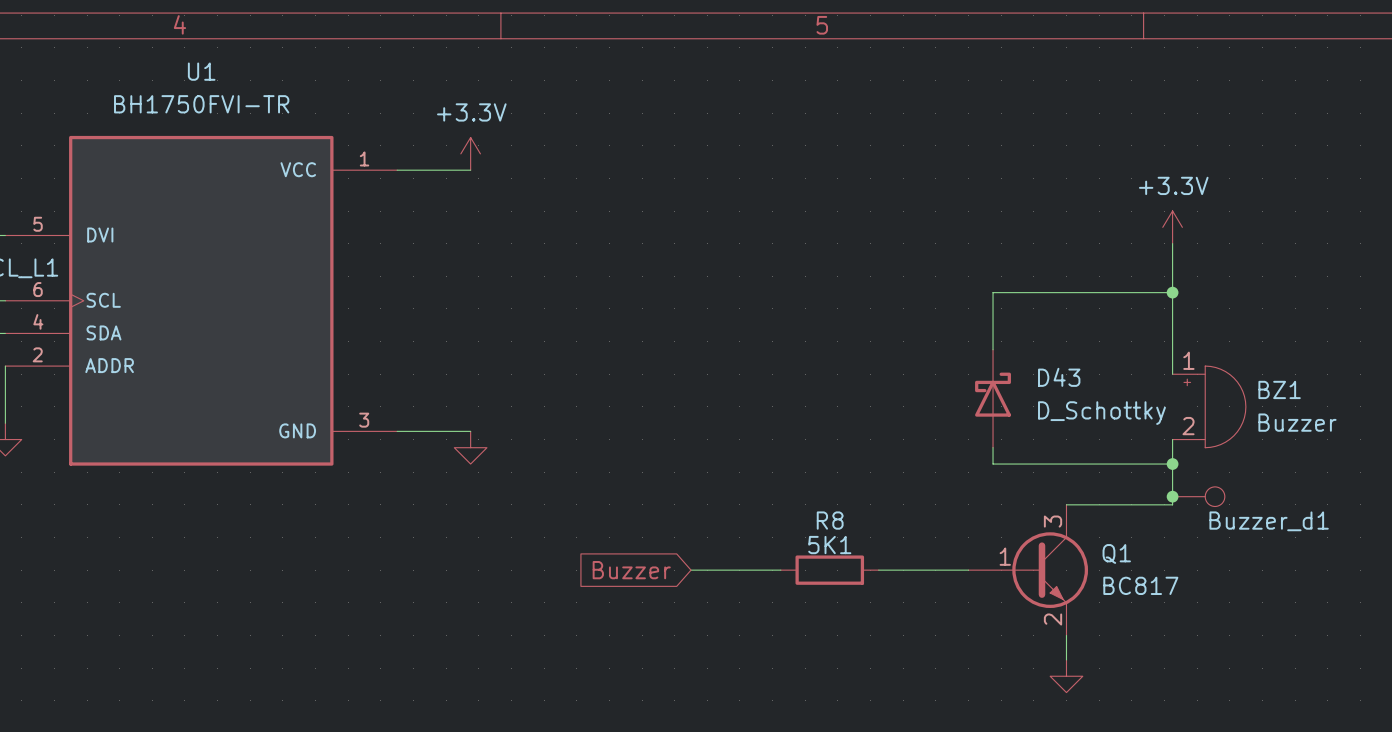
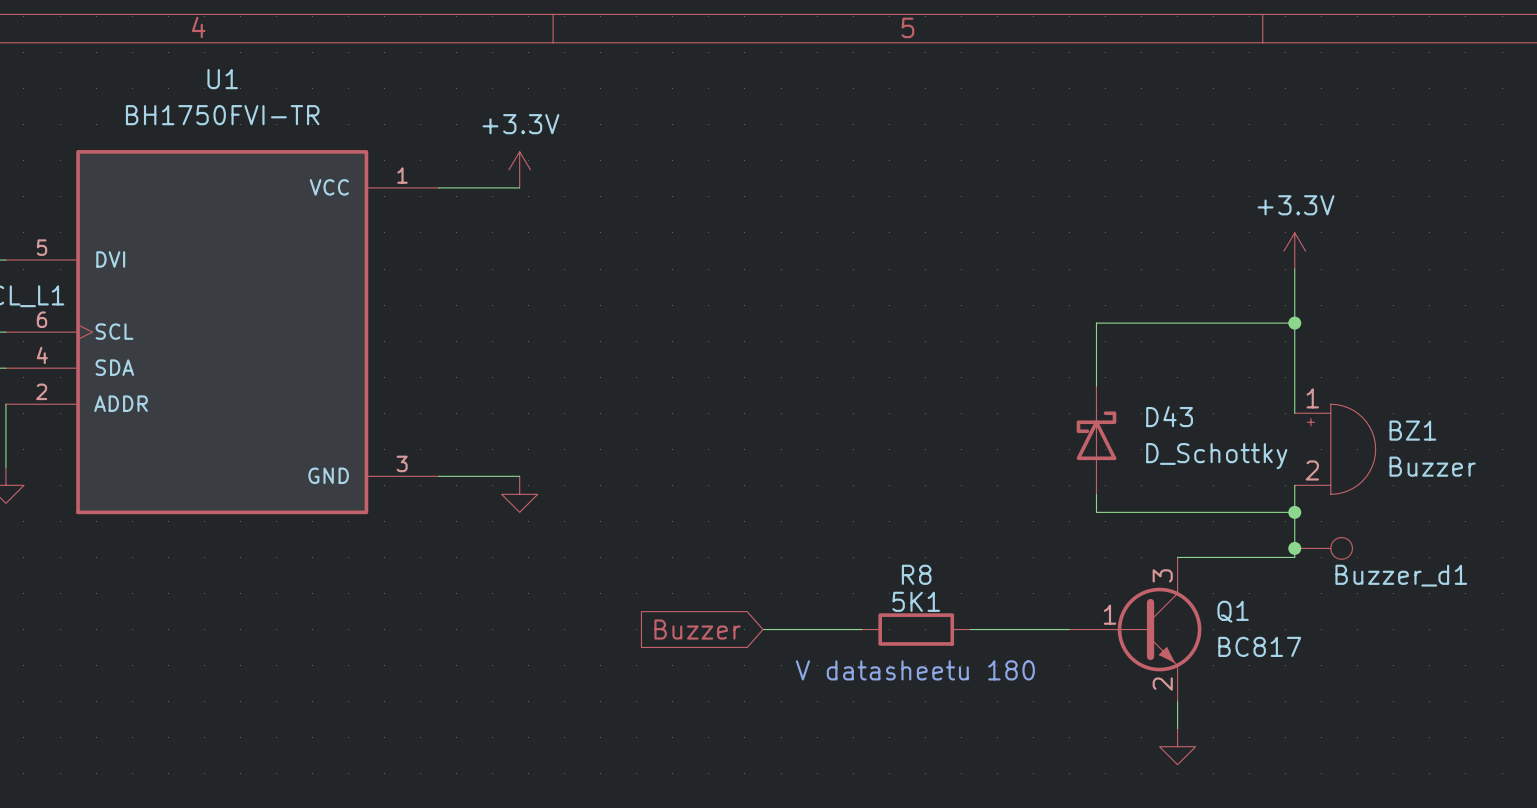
text: none -> V datasheetu 180 (915, 670)

